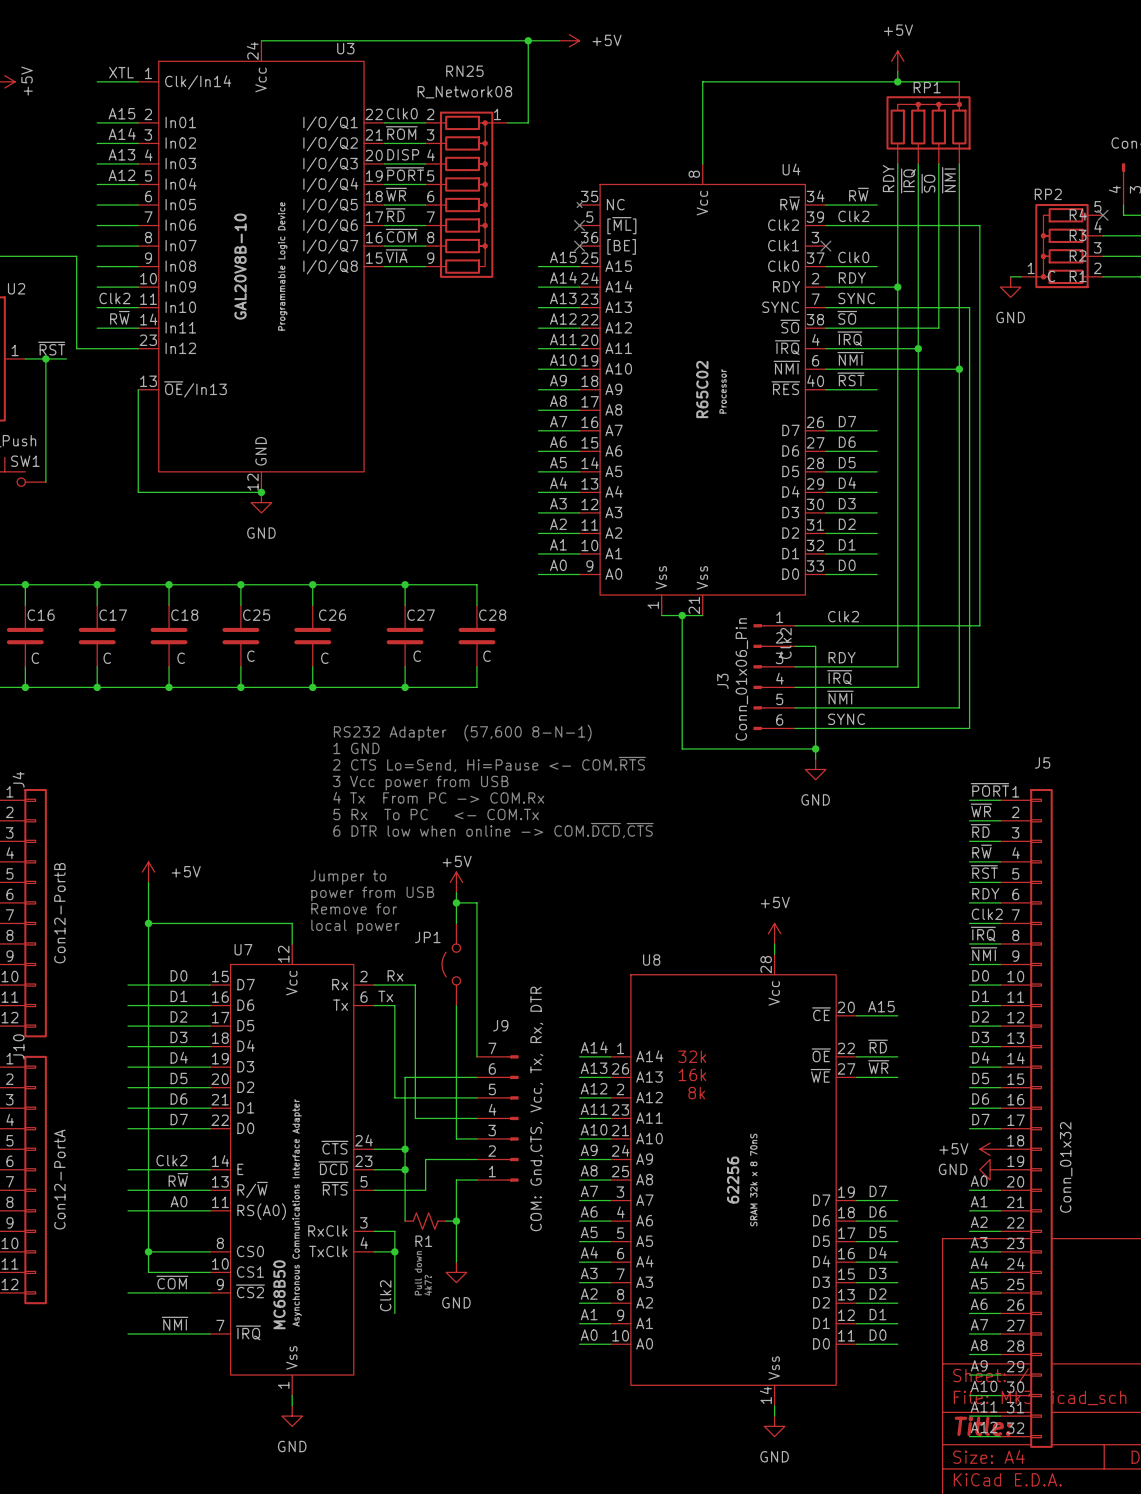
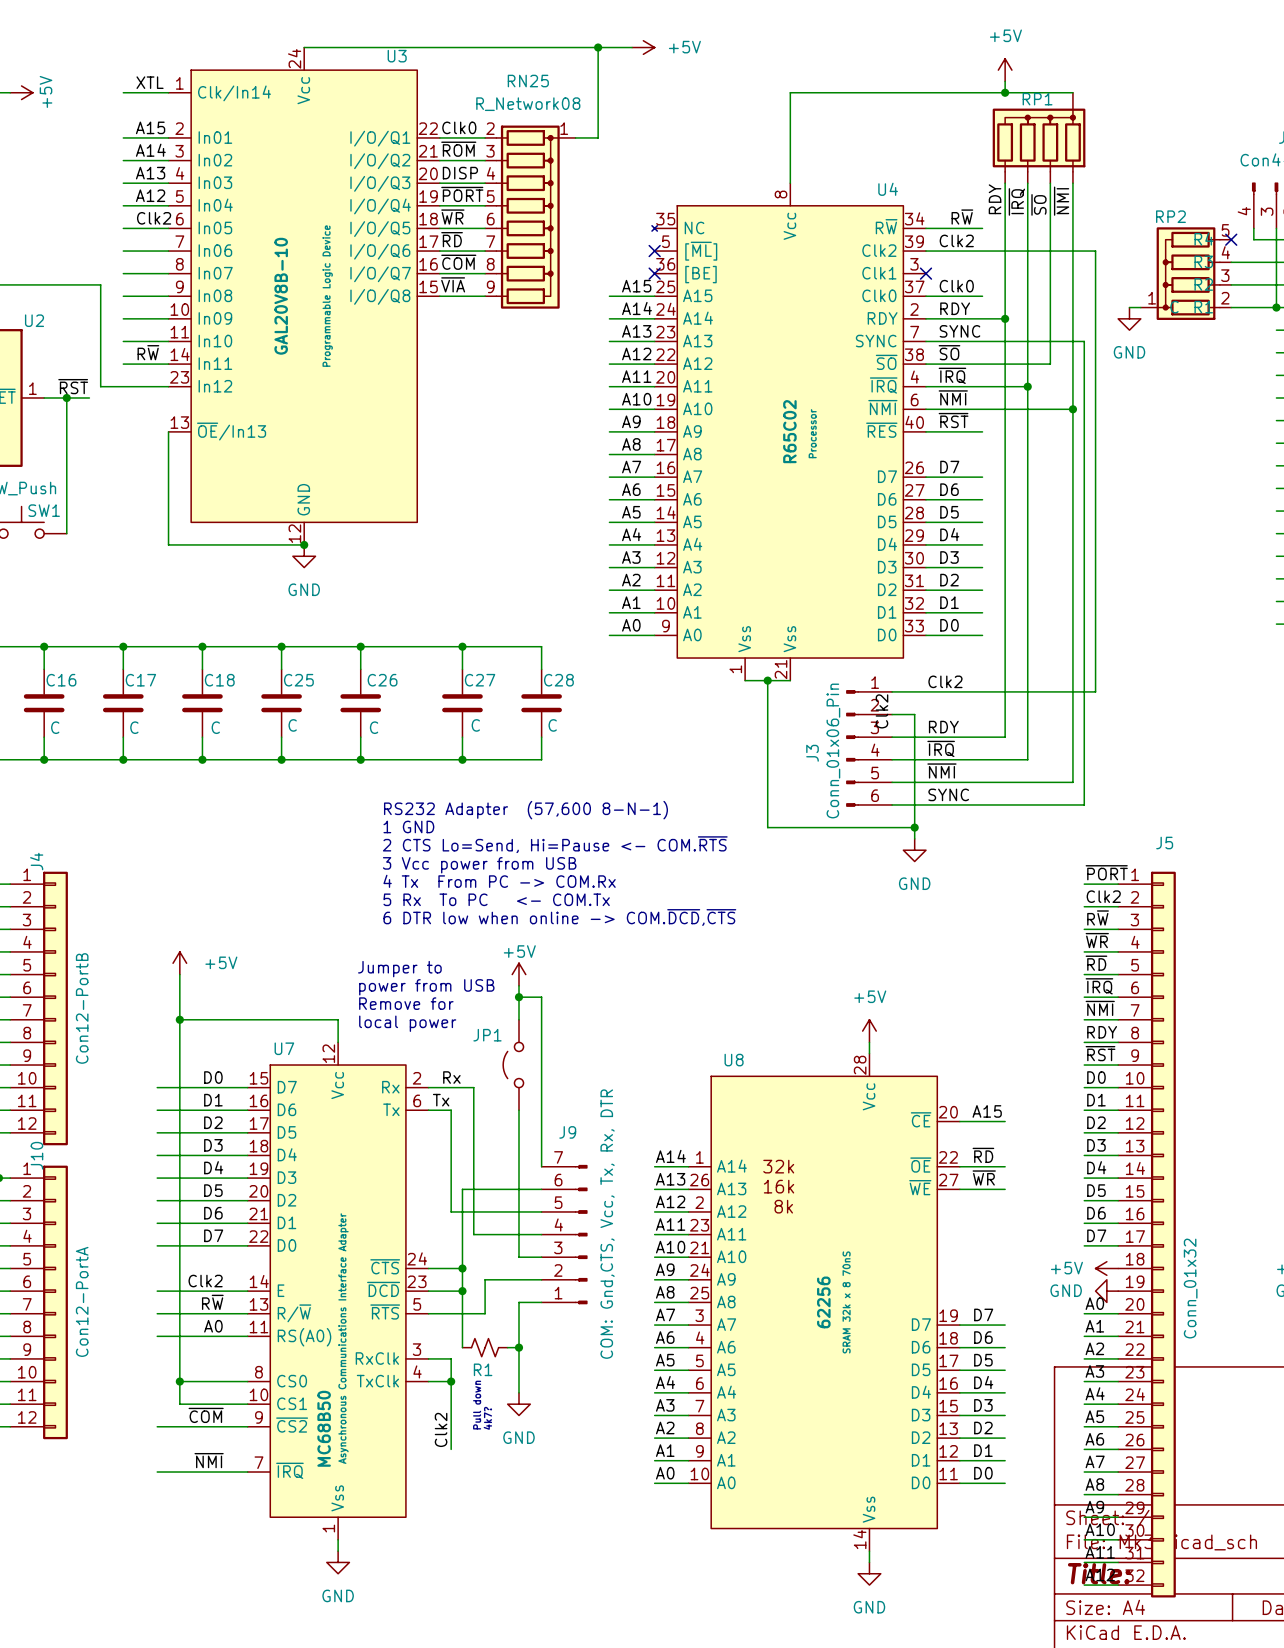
label position: Clk2 (114, 298) -> Clk2 (154, 218)
label: ~{WR} (981, 810) -> Clk2 (1103, 896)
label: ~{RD} (980, 831) -> R~{W} (1098, 917)
label: R~{W} (982, 851) -> ~{WR} (1097, 940)
label: ~{RST} (984, 872) -> ~{RD} (1096, 963)
label: RDY (985, 893) -> ~{IRQ} (1099, 986)
label: Clk2 (987, 914) -> ~{NMI} (1100, 1008)
label: ~{IRQ} (983, 934) -> RDY (1102, 1032)
label: ~{NMI} (984, 954) -> ~{RST} (1100, 1053)

